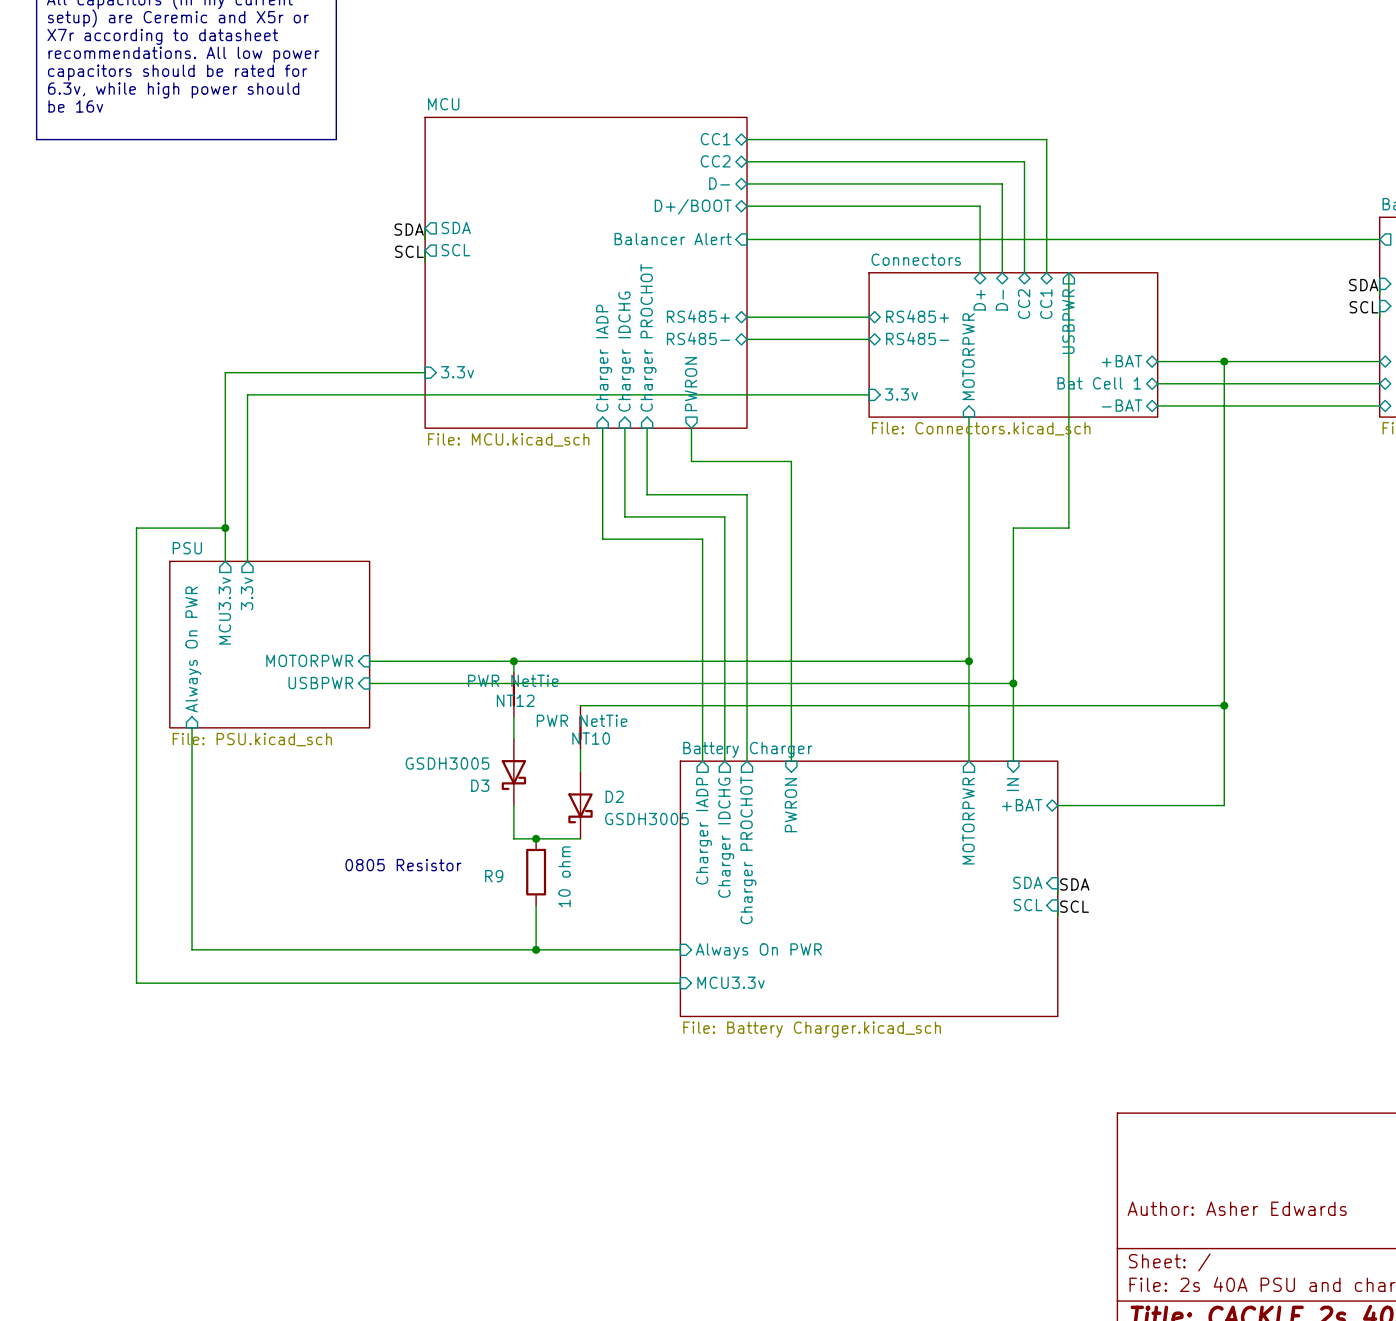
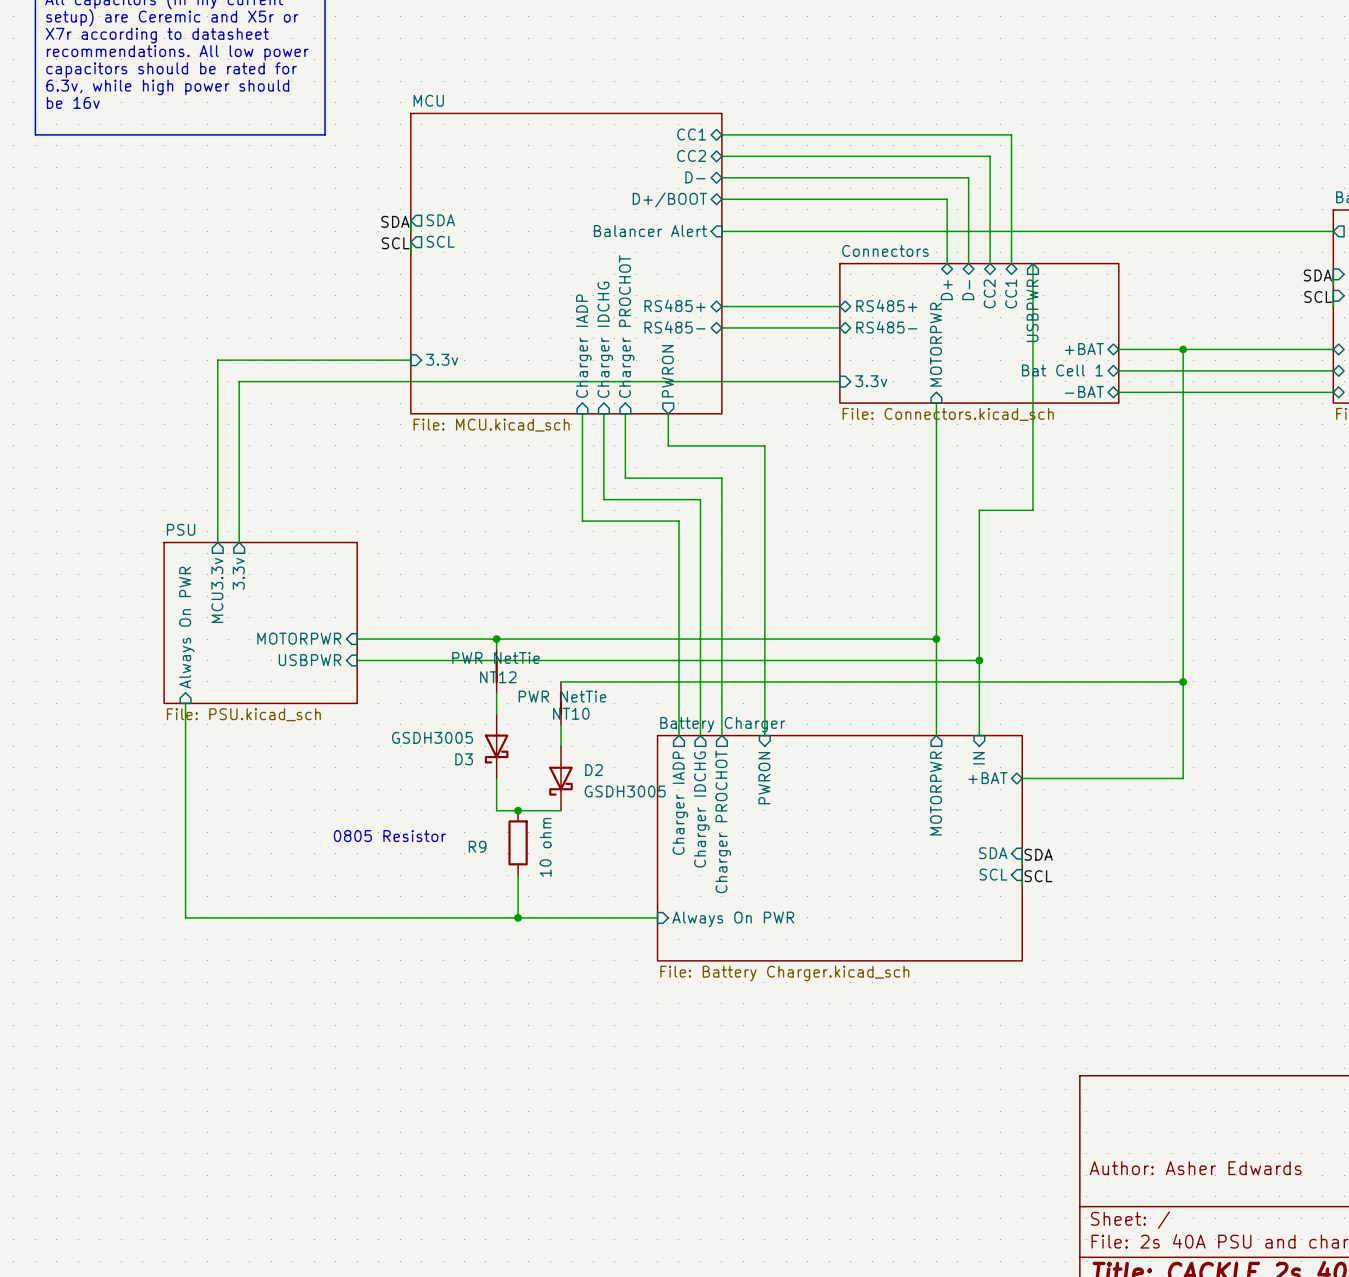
wire: (225, 528) (136, 528) (136, 983) (680, 983) -> none
junction: (225, 528) -> none
sheet Battery Charger: none -> File: Battery Charger.kicad_sch (839, 848)
sheet Battery Charger: File: Battery Charger.kicad_sch (869, 888) -> none
sheet pin: MCU3.3v (731, 982) -> none

